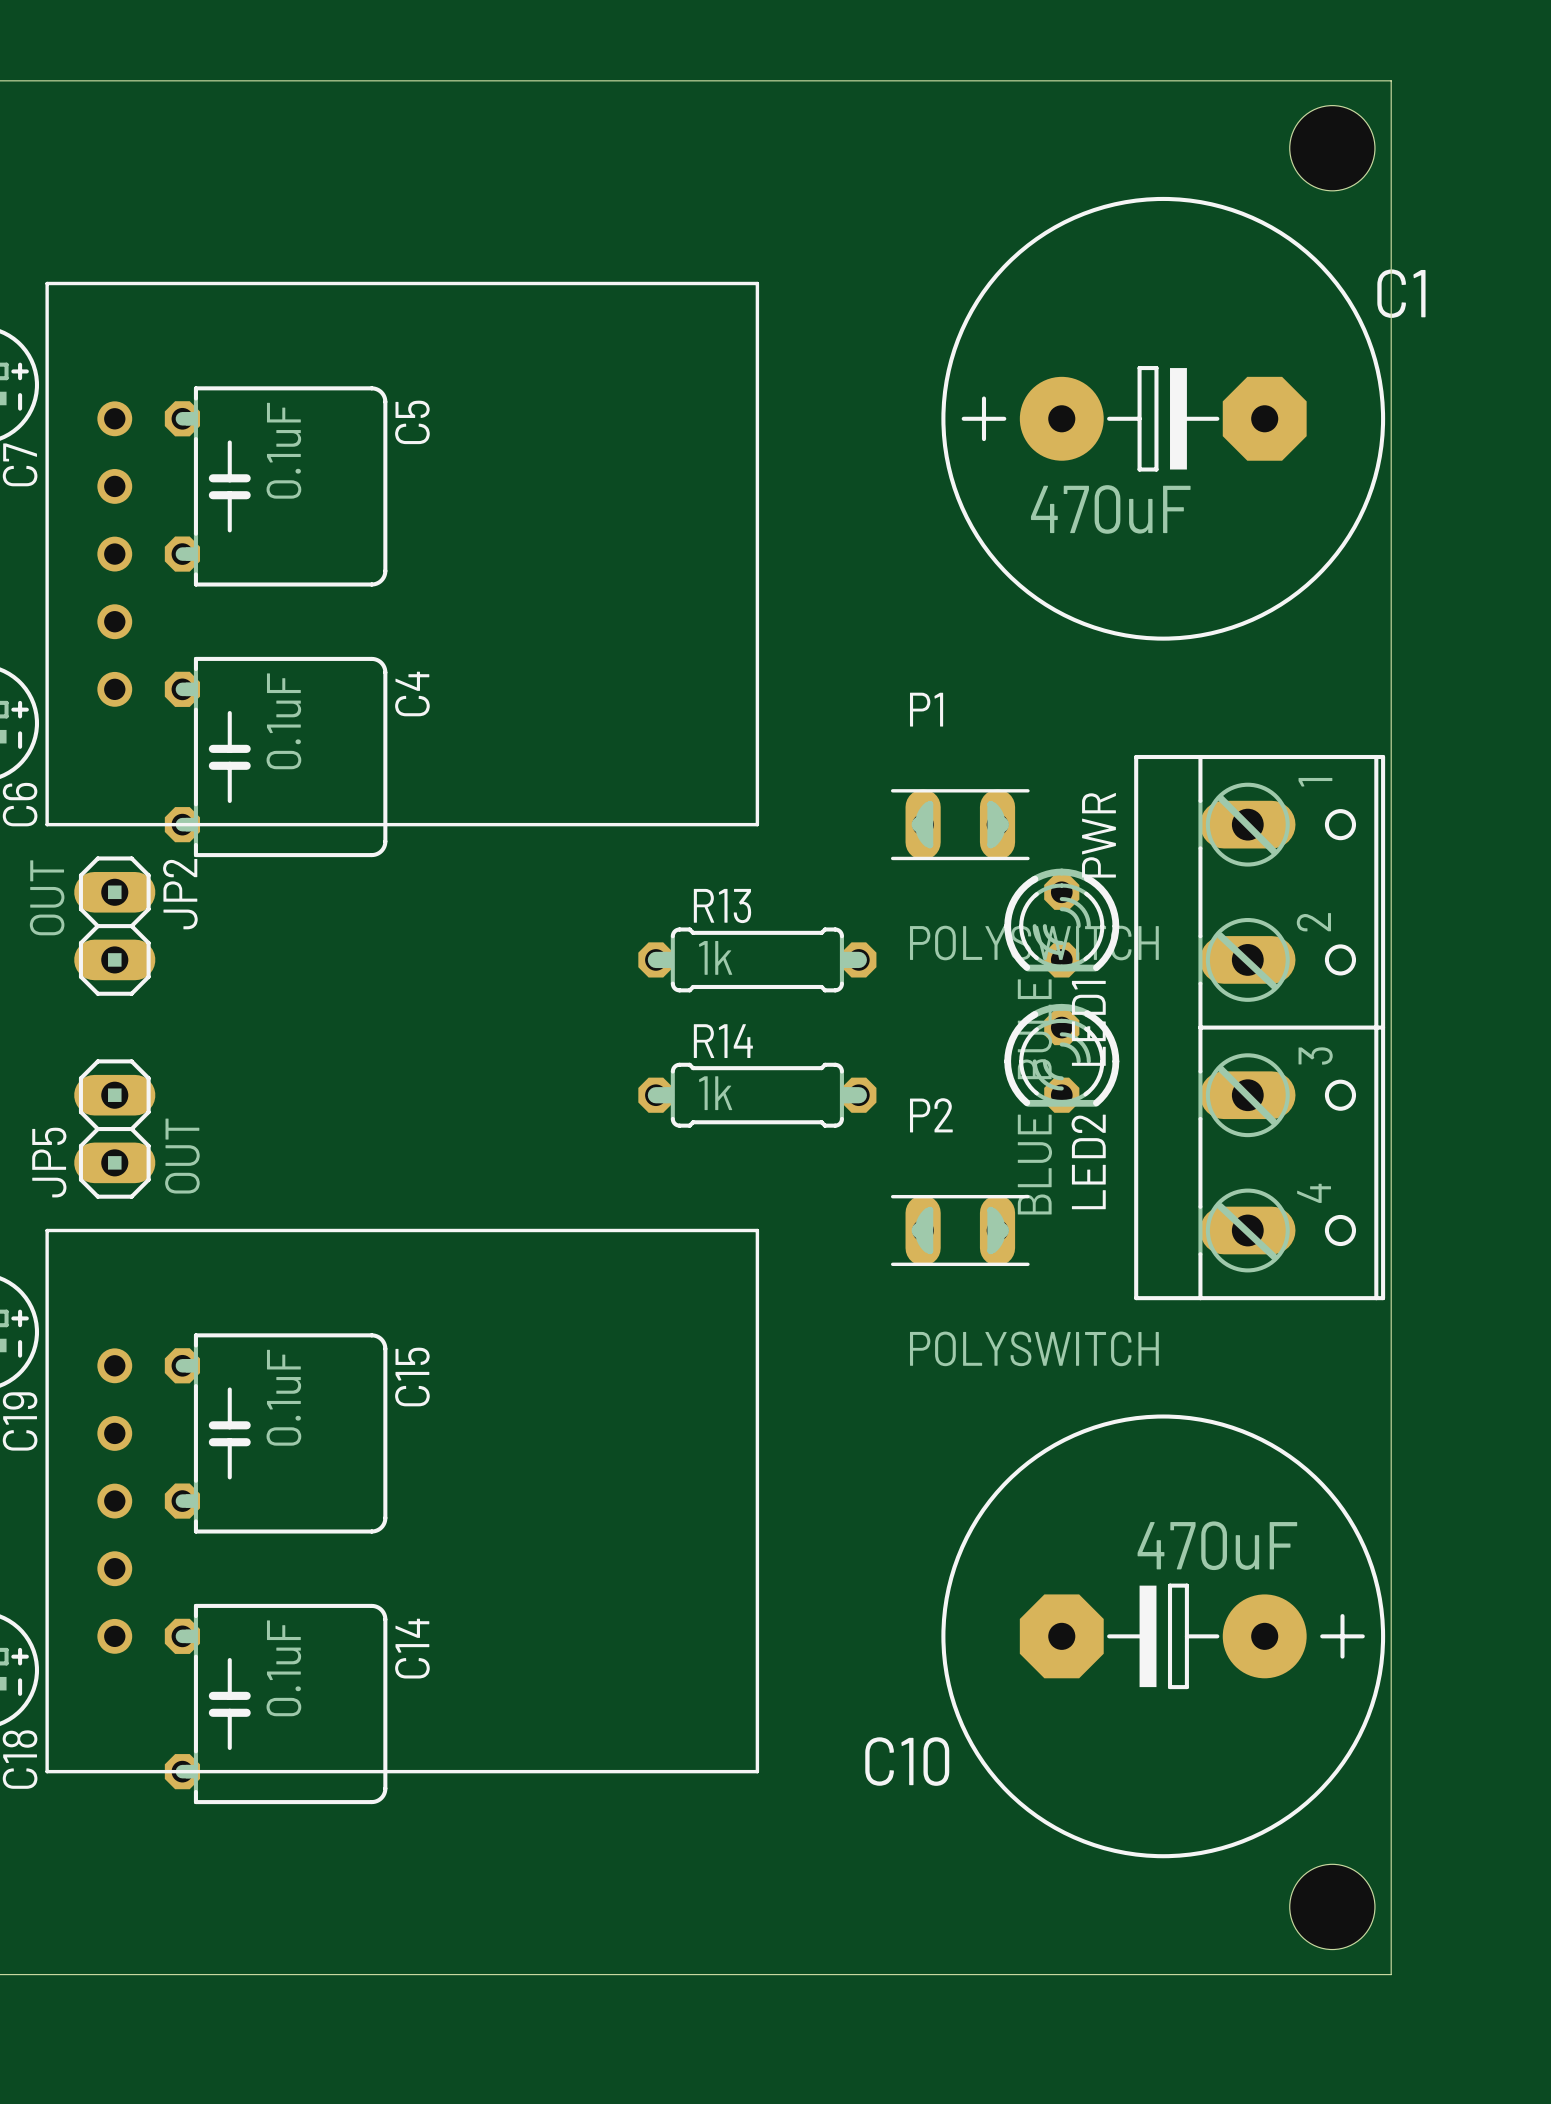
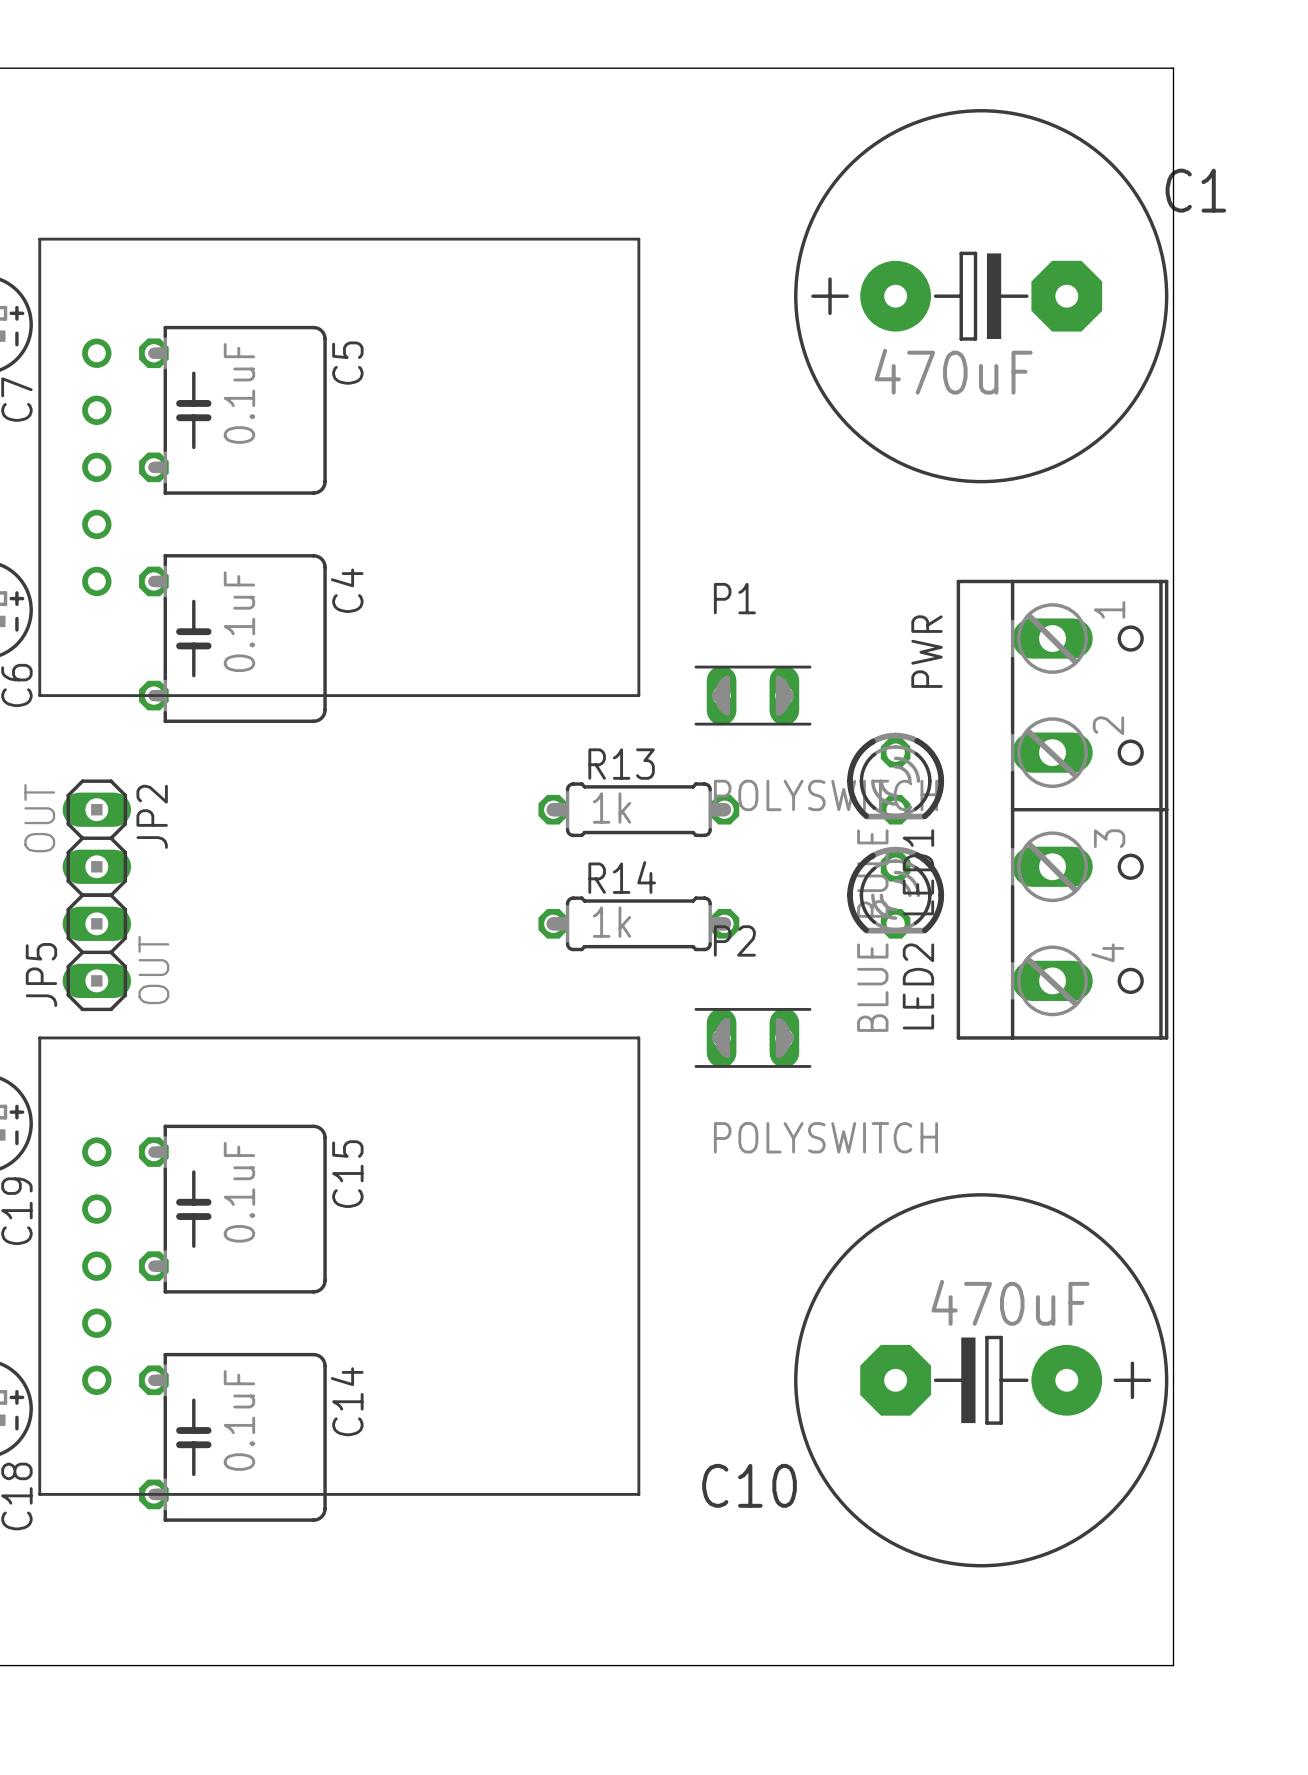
hole: (1332, 148) -> none
C1 position: (1163, 418) -> (981, 296)
P1 position: (960, 824) -> (752, 695)
JP2 position: (114, 926) -> (96, 838)
PWR position: (1259, 1027) -> (1062, 809)
P2 position: (960, 1230) -> (752, 1037)
hole: (1332, 1906) -> none

